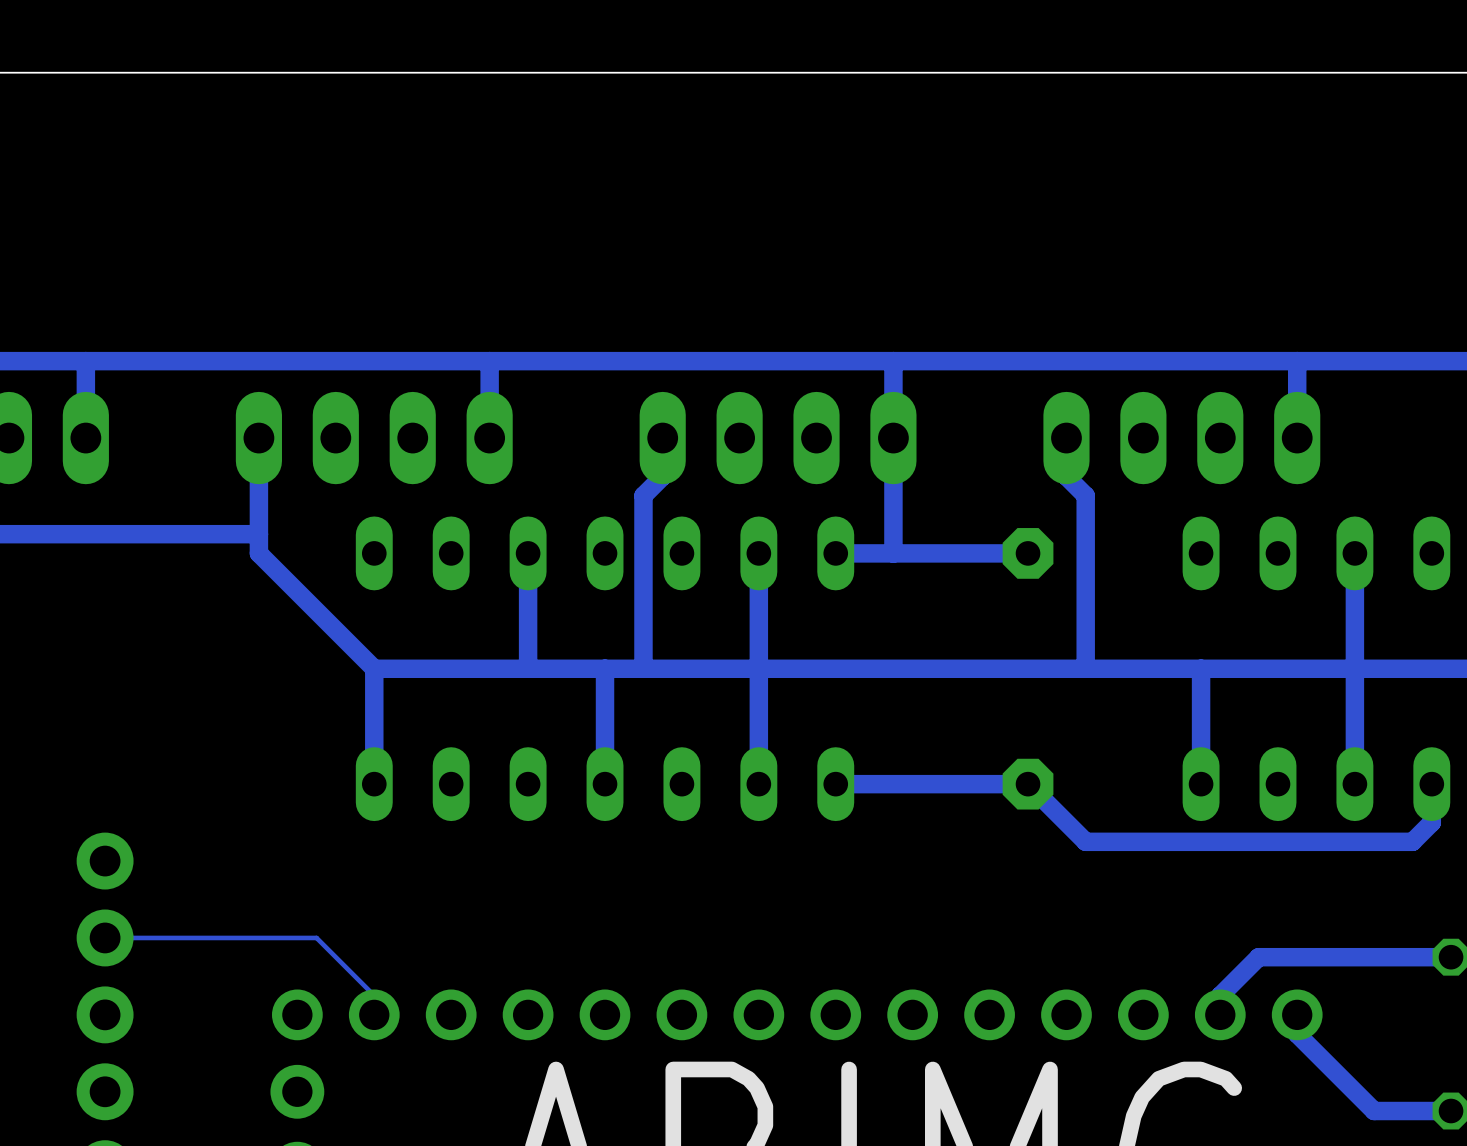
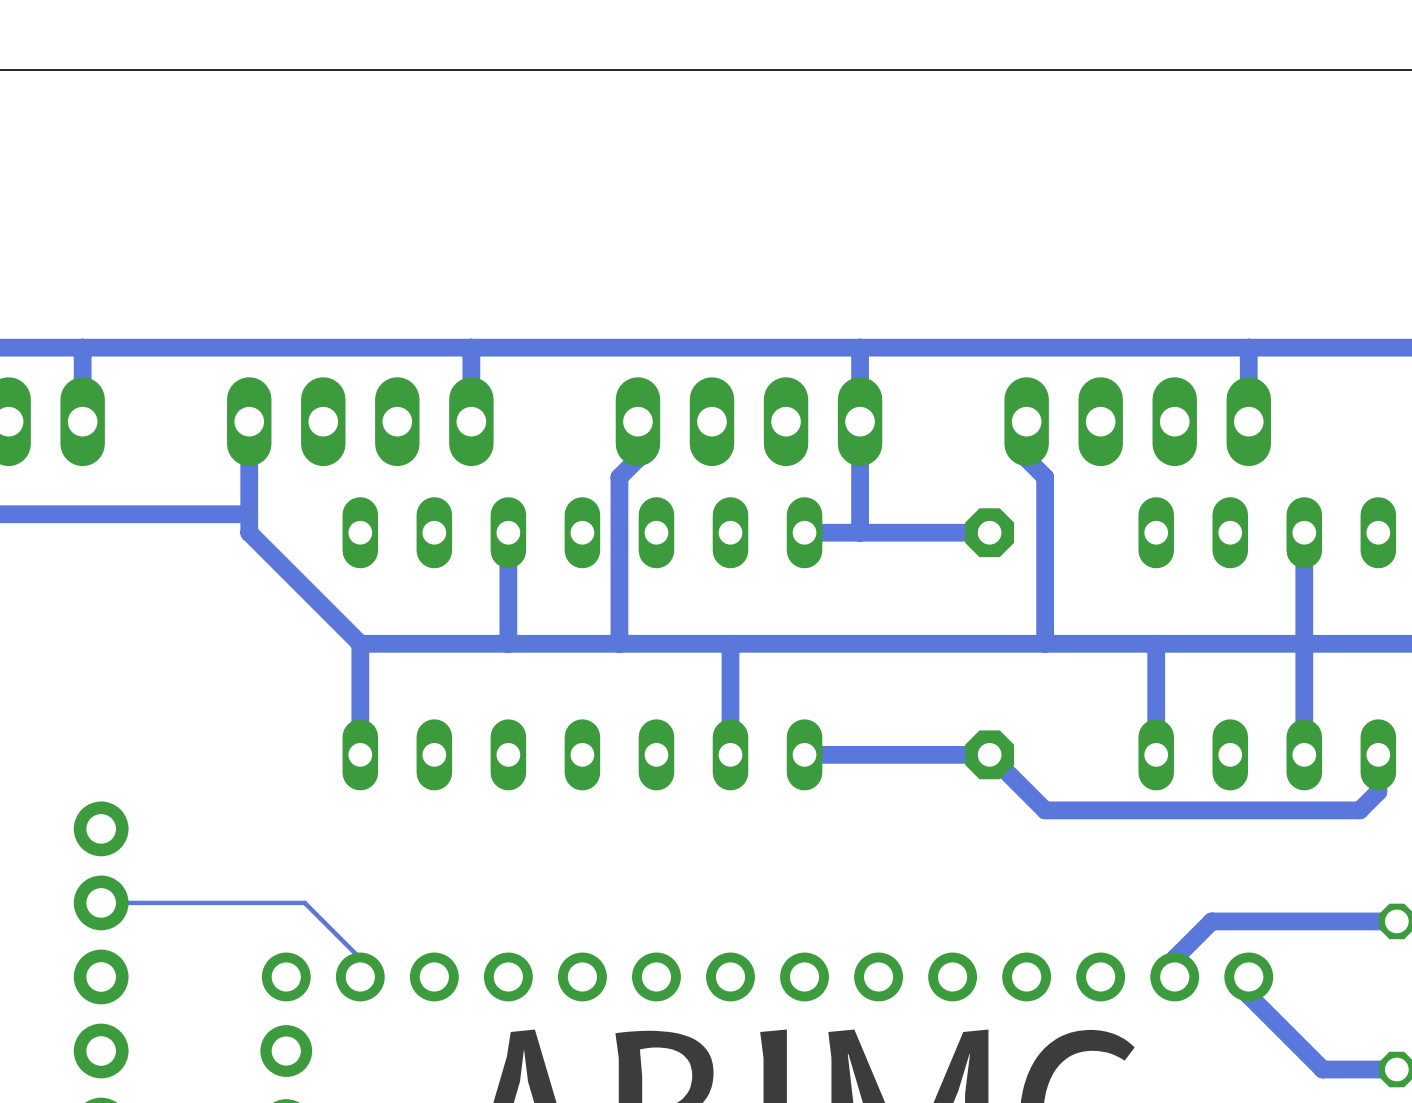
track: (758, 553) (758, 668) -> none
track: (605, 668) (605, 784) -> none

